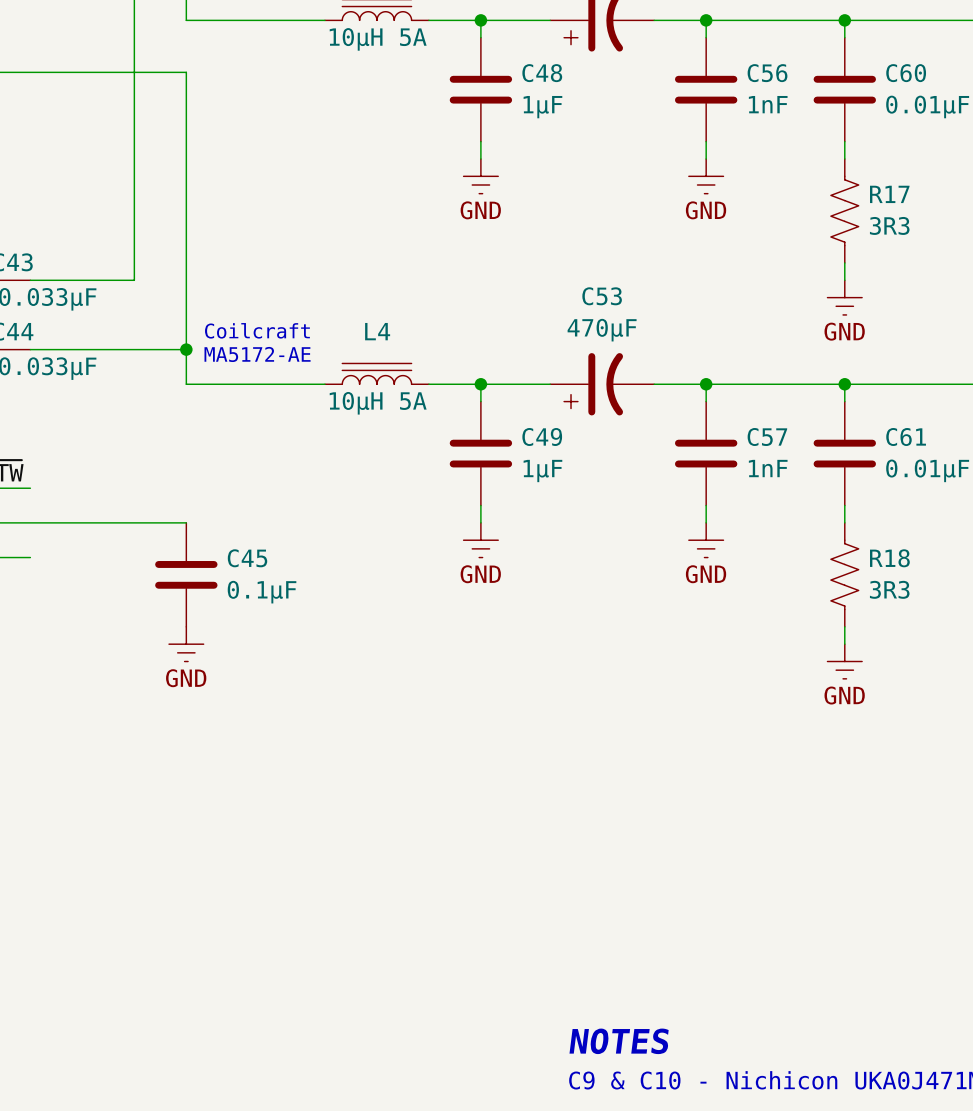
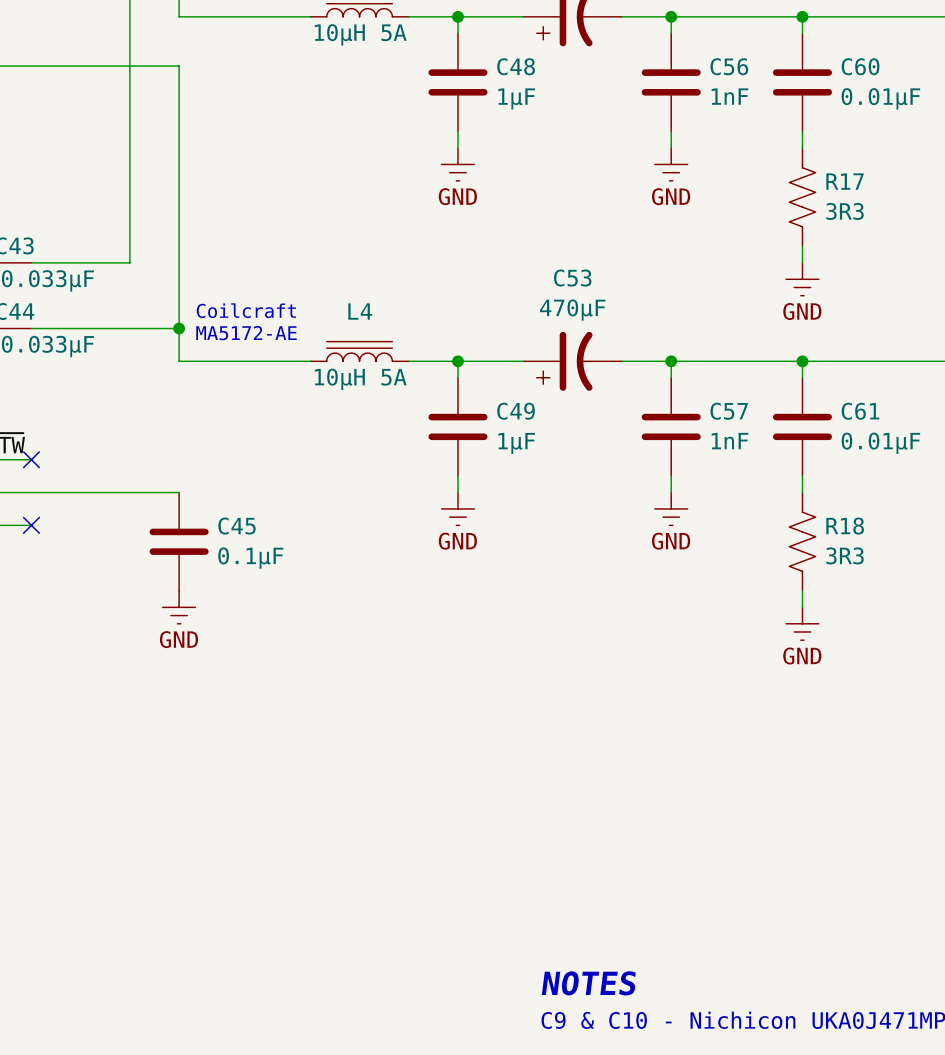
no-connect mark: none -> (31, 459)
no-connect mark: none -> (31, 525)

